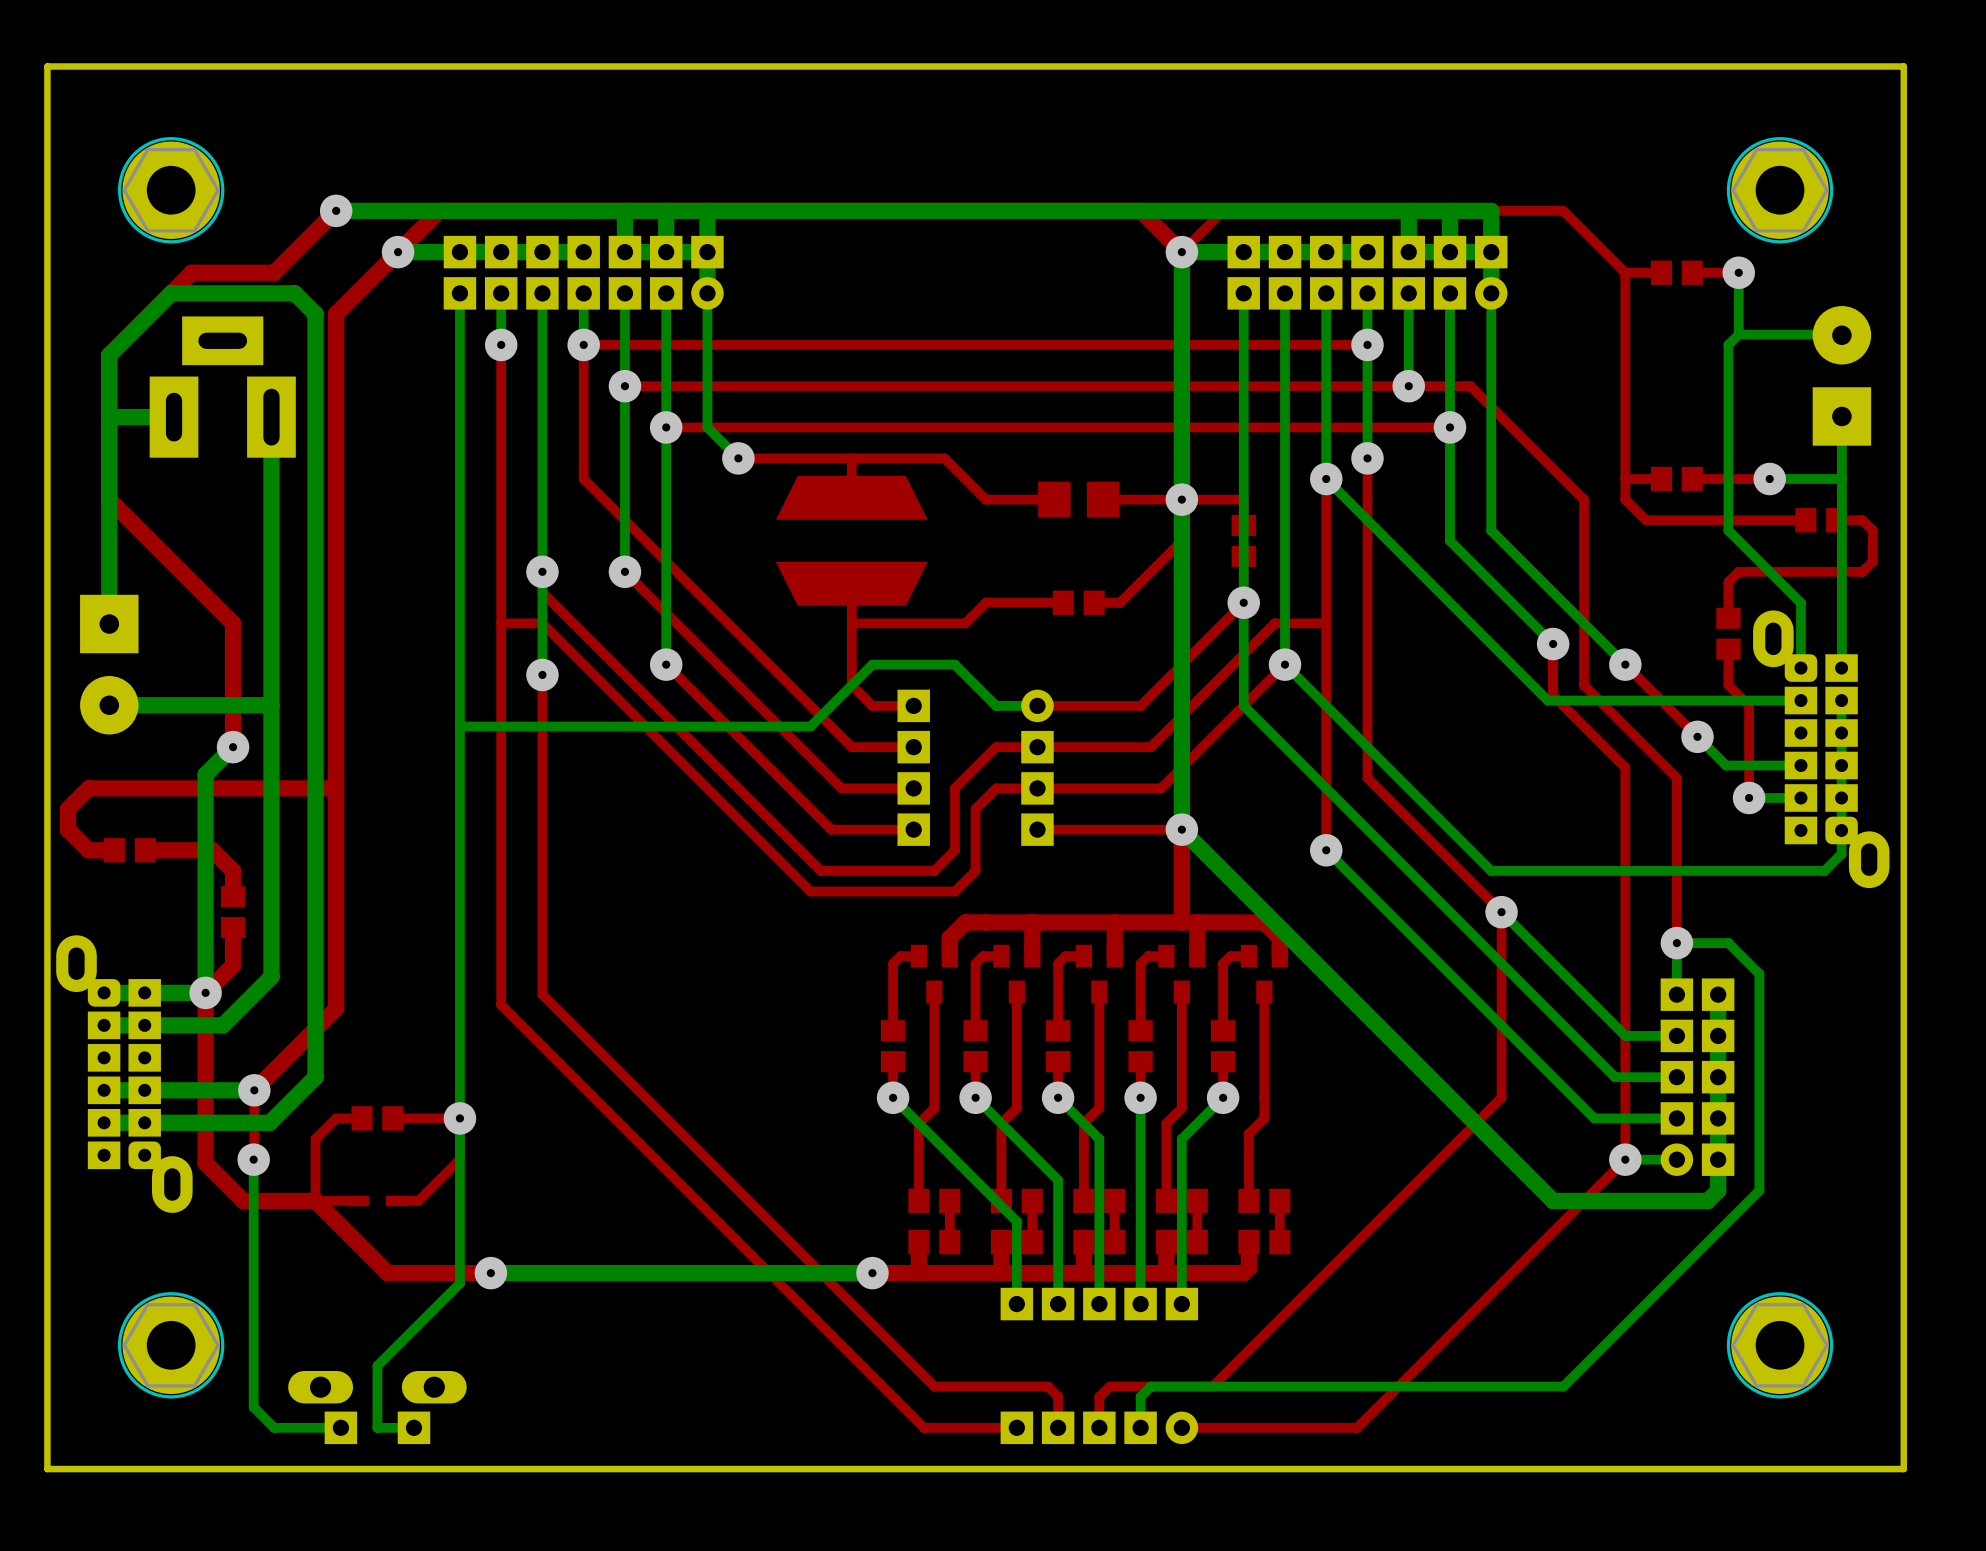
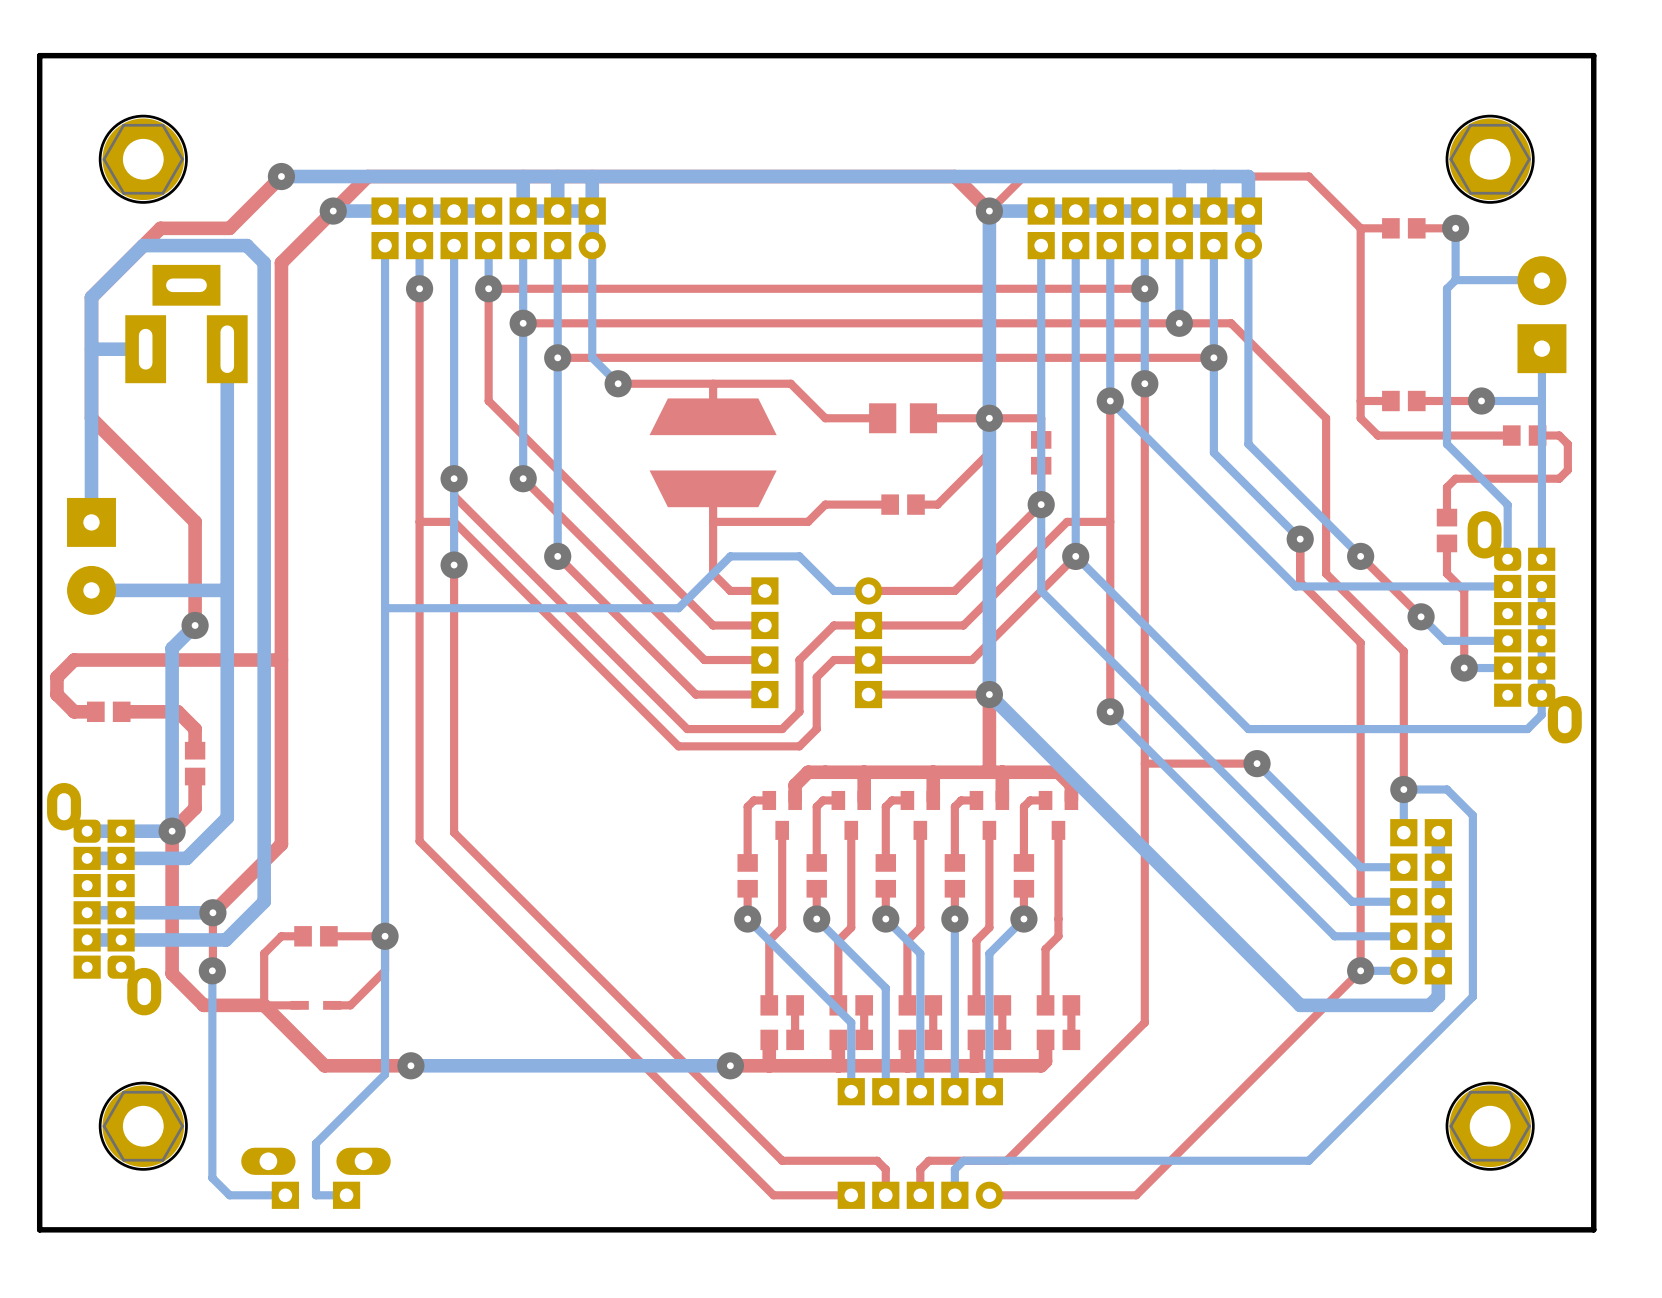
top track: (1367, 778) (1501, 912) (1501, 1097) (1212, 1386) (1202, 1386) -> (1144, 651) (1144, 1022) (1006, 1160)
top track: none -> (1257, 763) (1144, 763)

